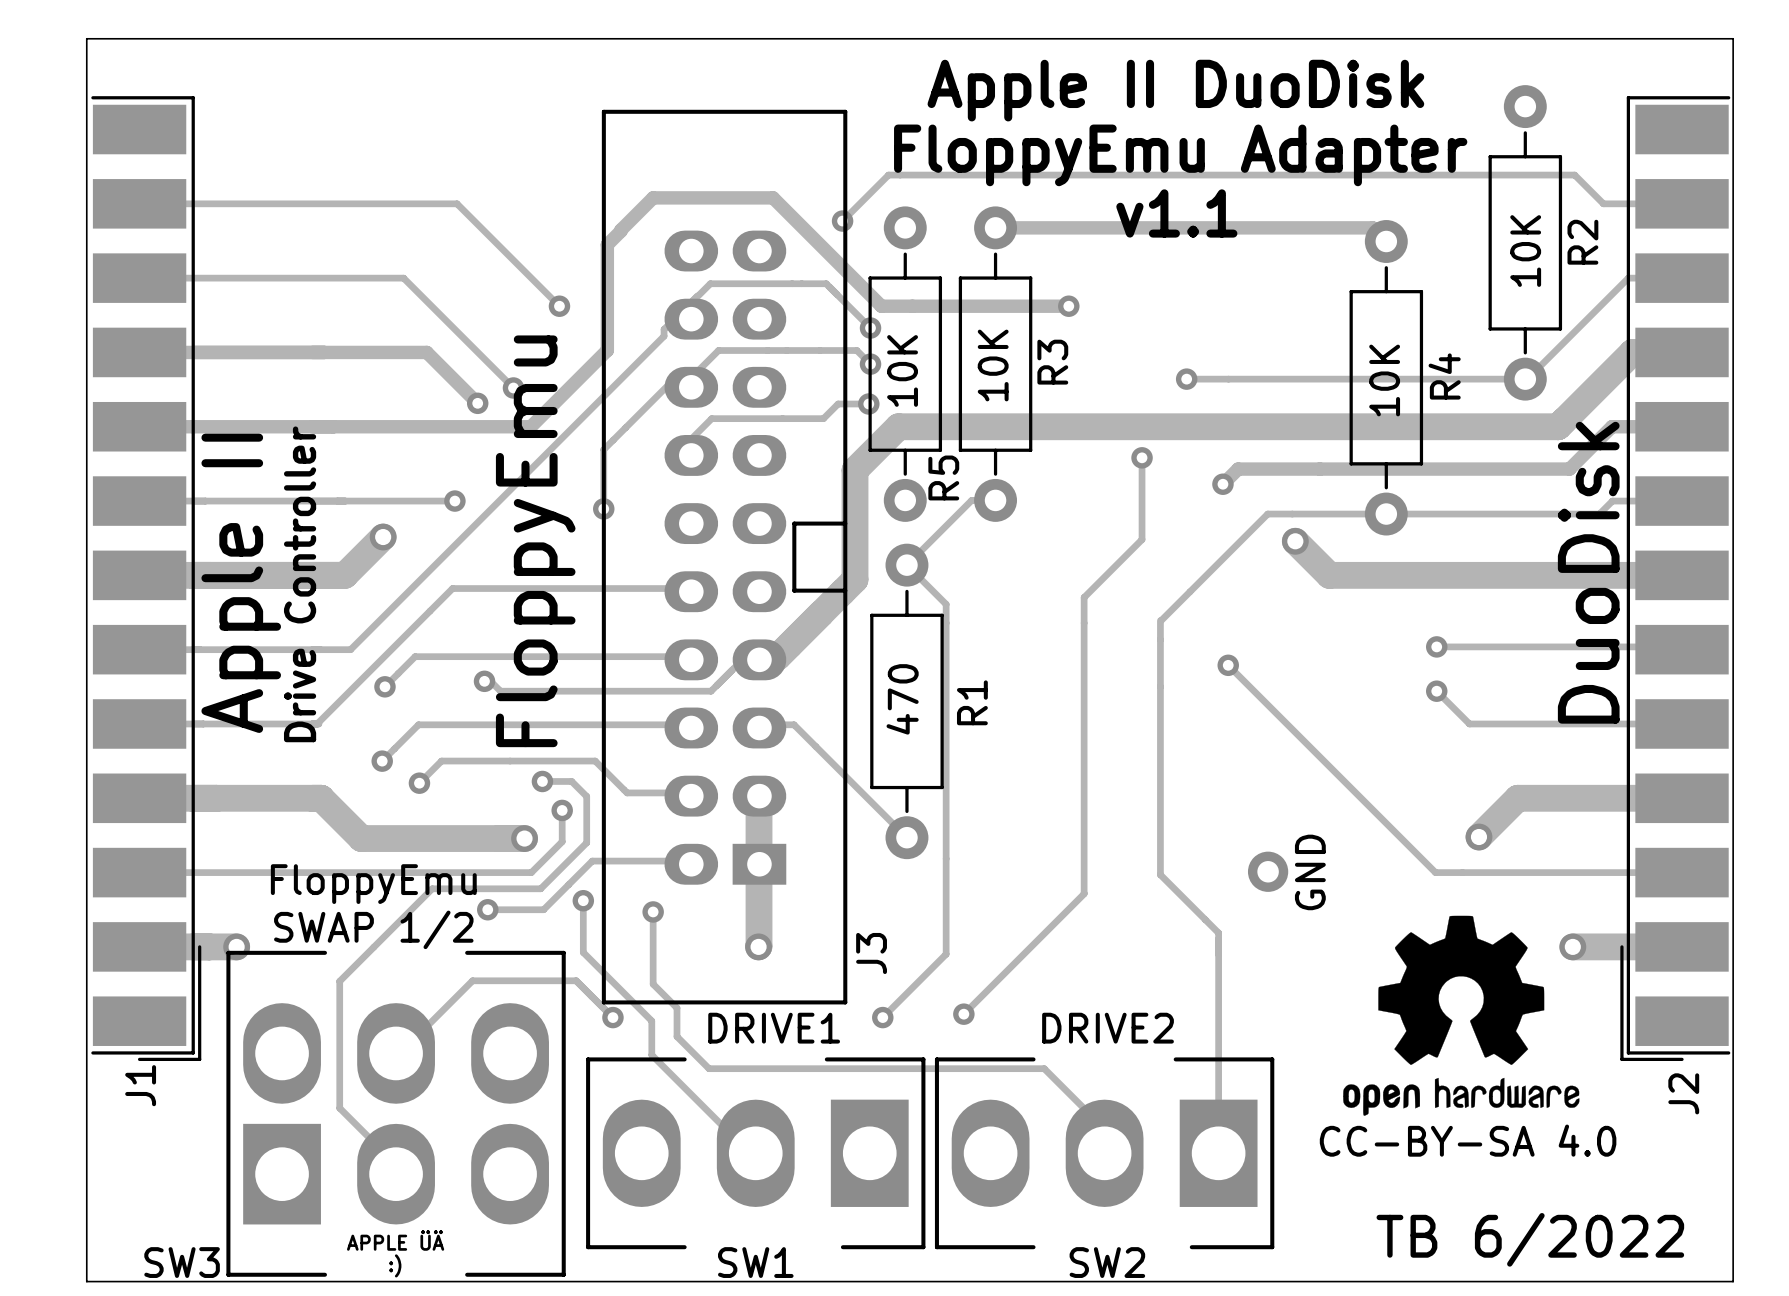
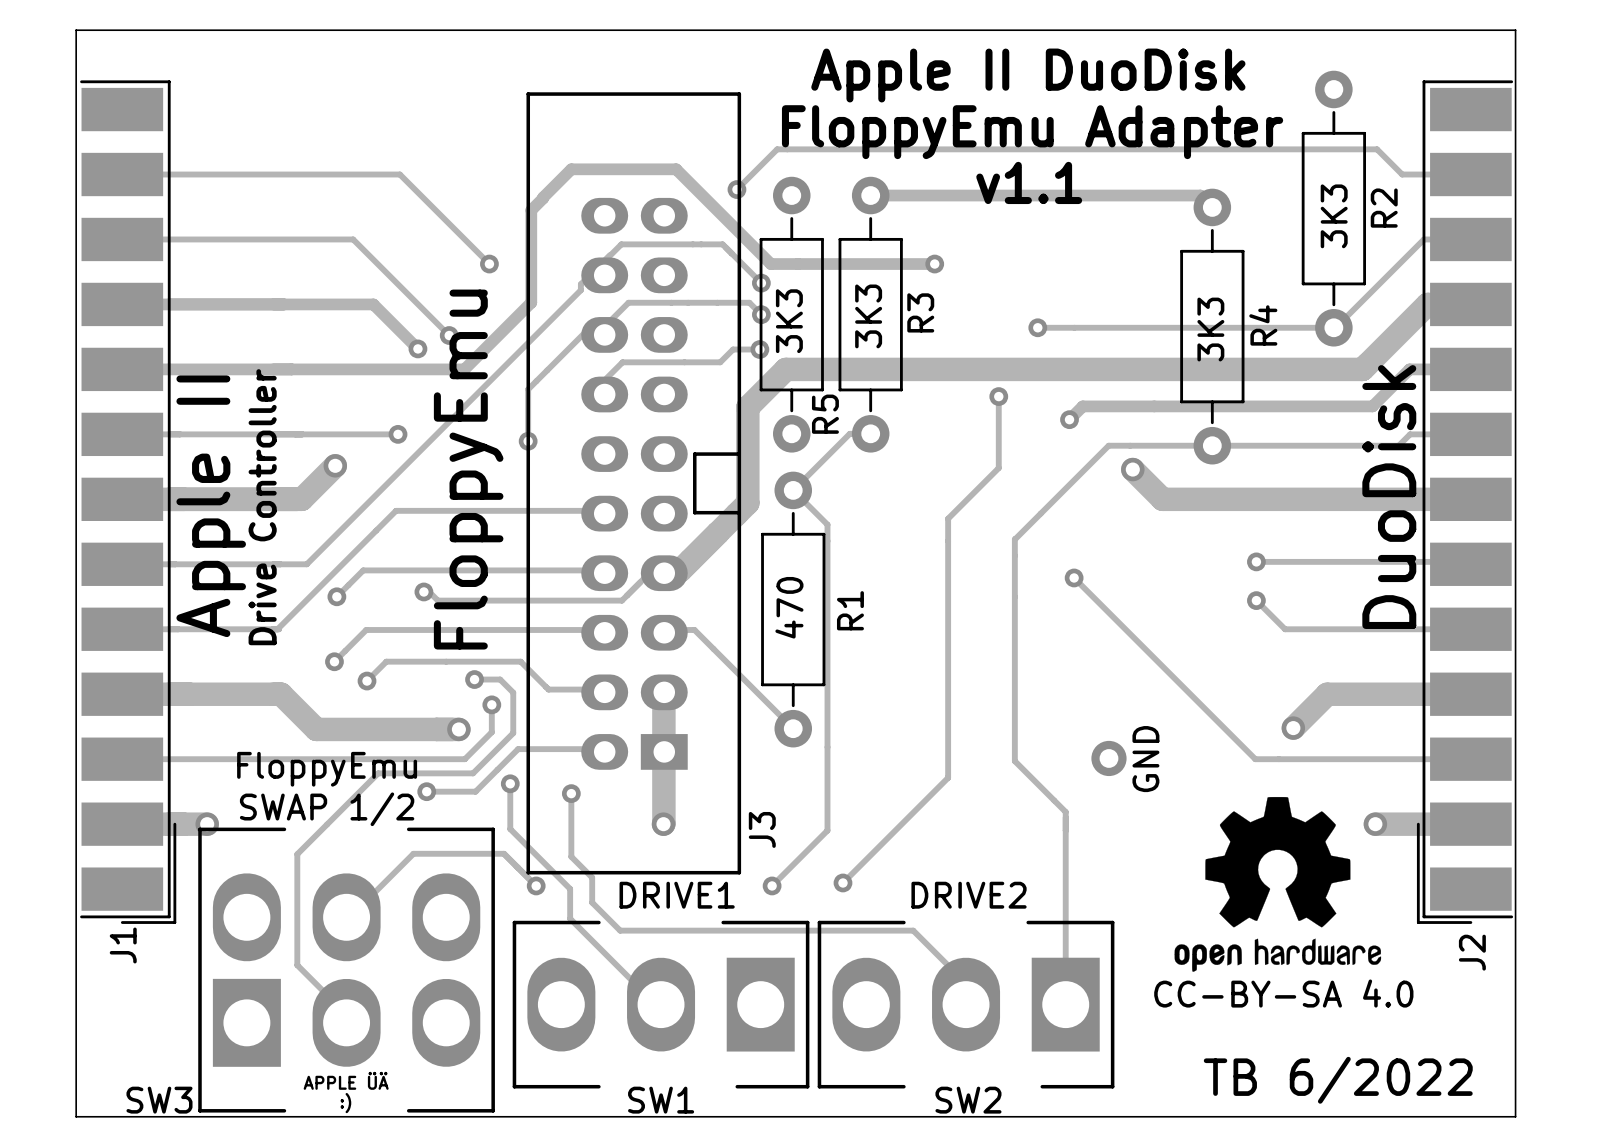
R2 value: 10K (1525, 251) -> 3K3 (1334, 216)
R3 value: 10K (993, 365) -> 3K3 (868, 316)
R5 value: 10K (902, 370) -> 3K3 (789, 321)
R4 value: 10K (1384, 380) -> 3K3 (1210, 329)

